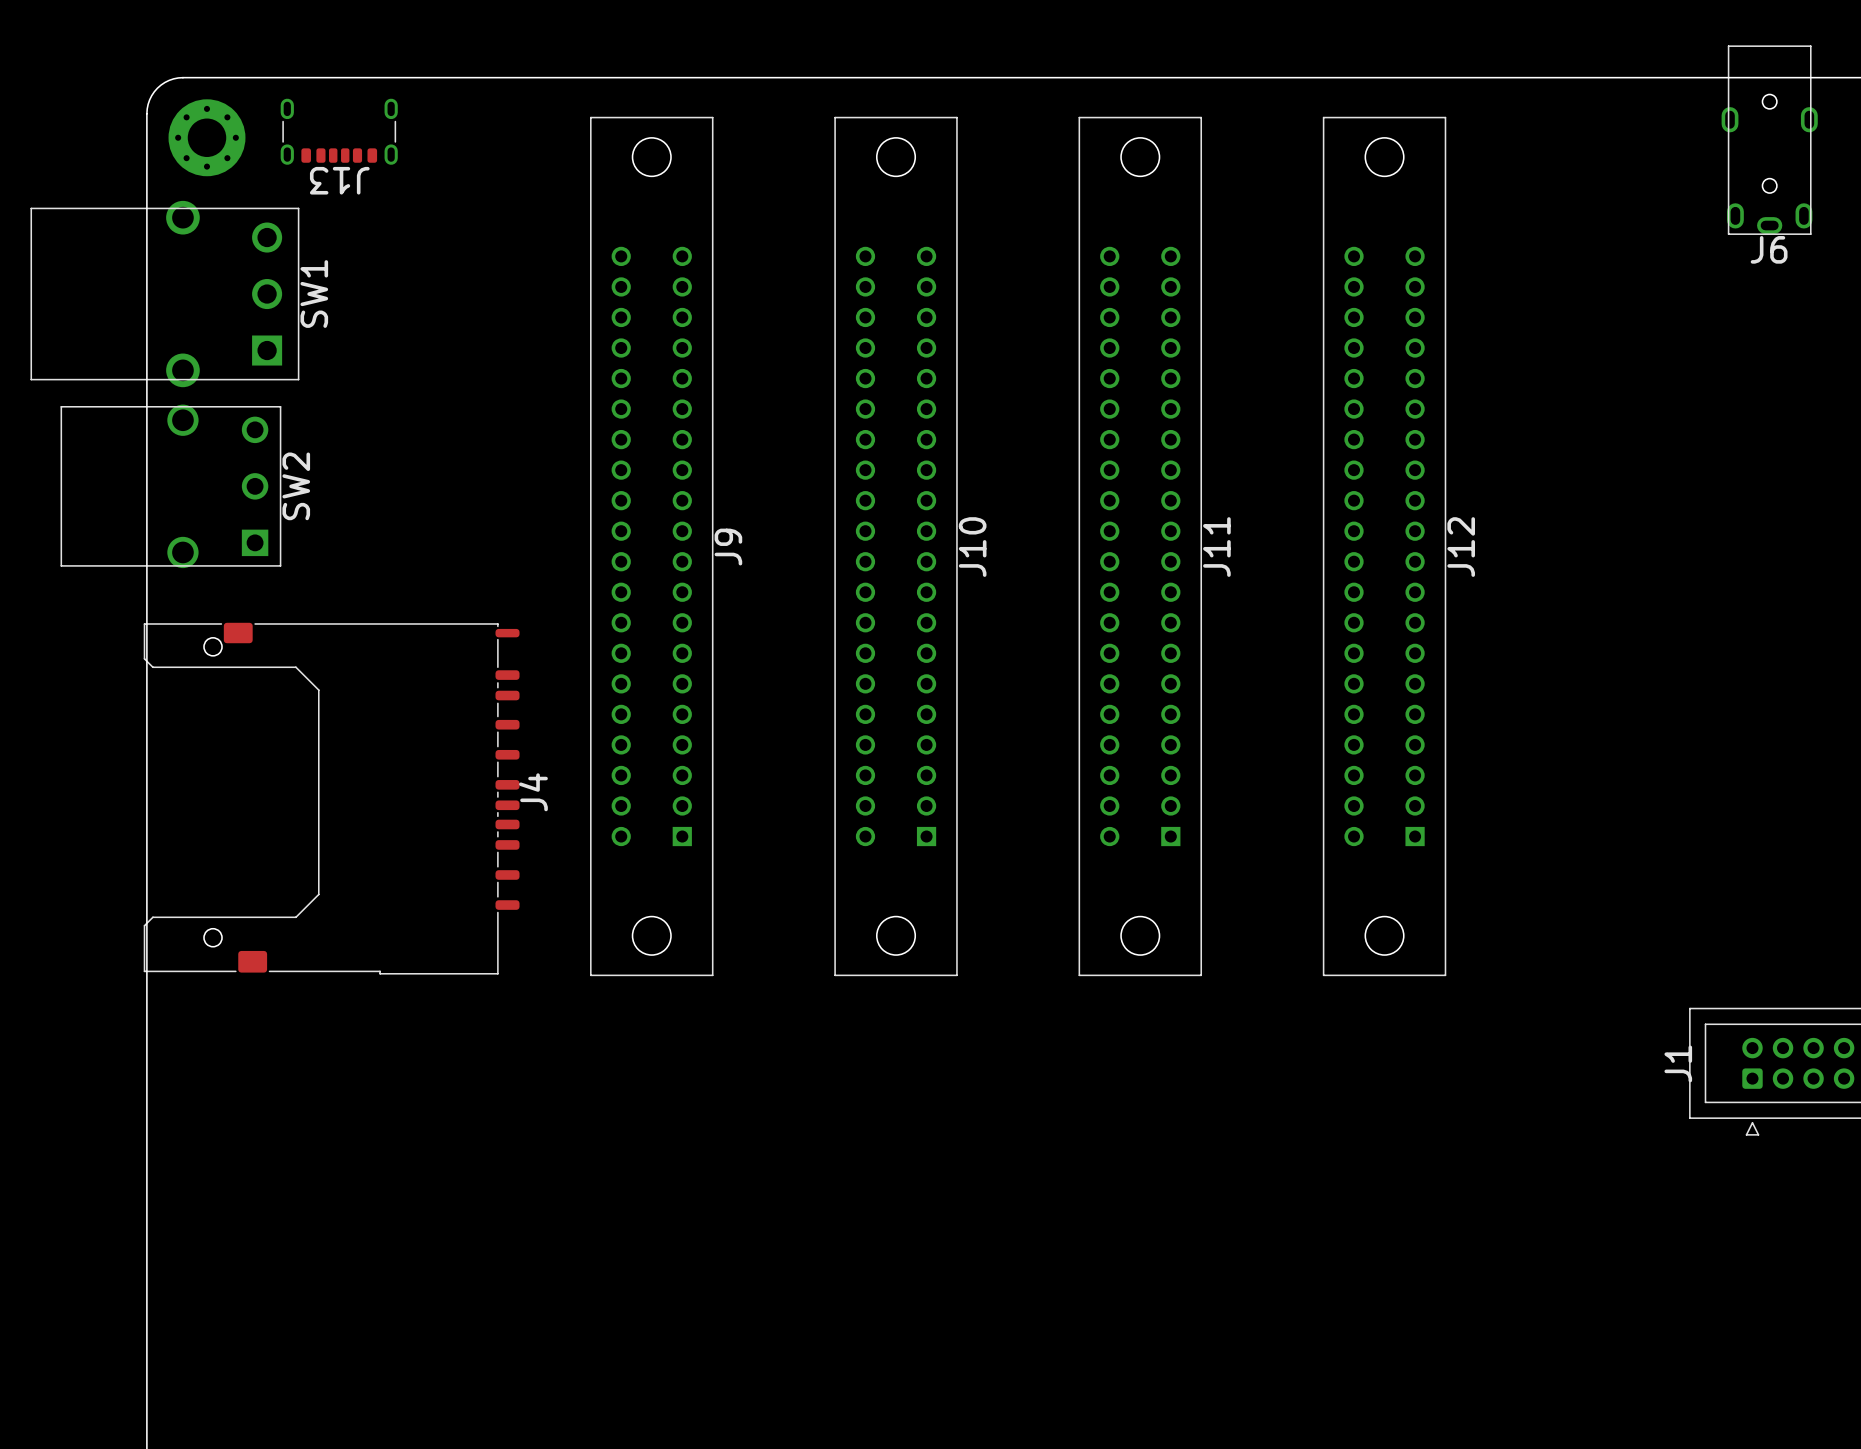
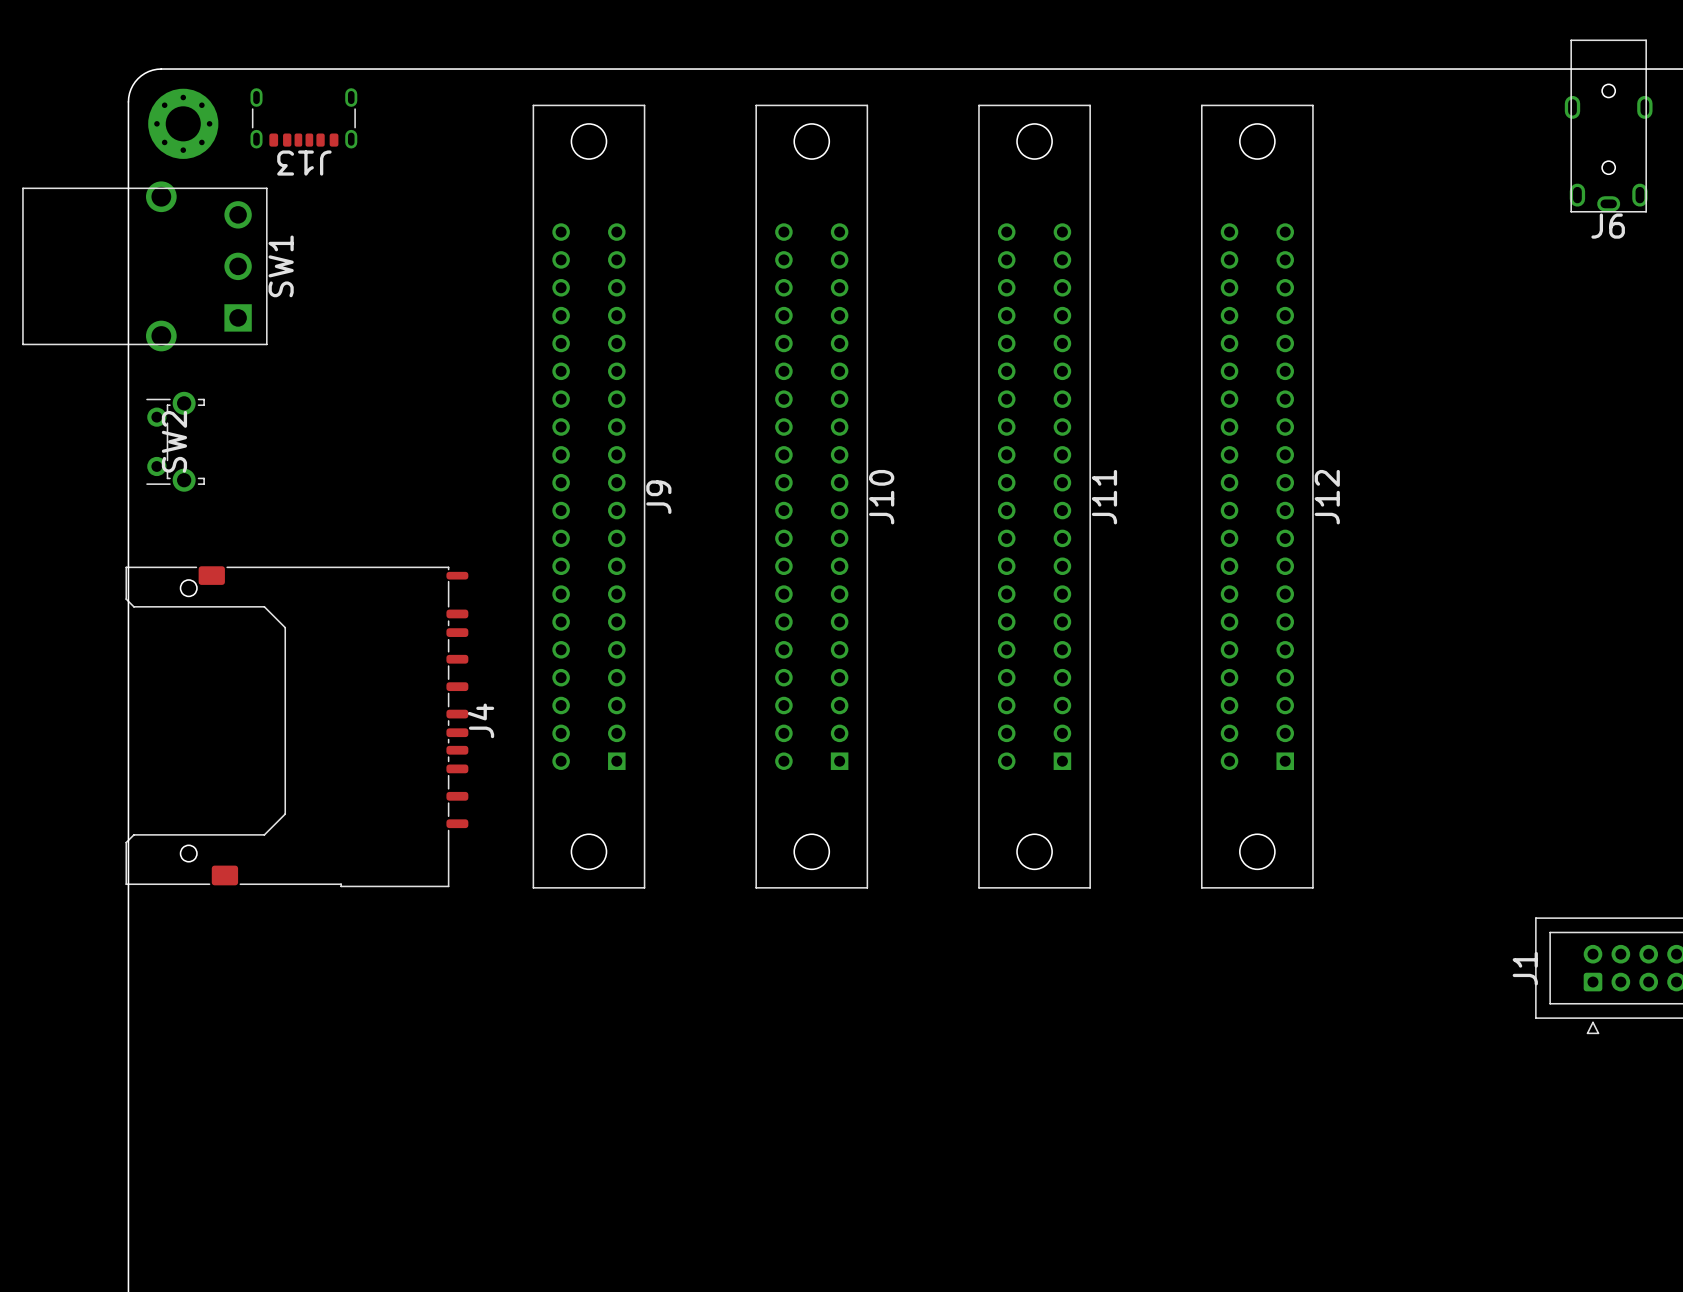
SW2 footprint: [60, 404, 282, 569] -> [146, 391, 205, 492]
SW2 name position: SW2 (296, 486) -> SW2 (174, 441)

